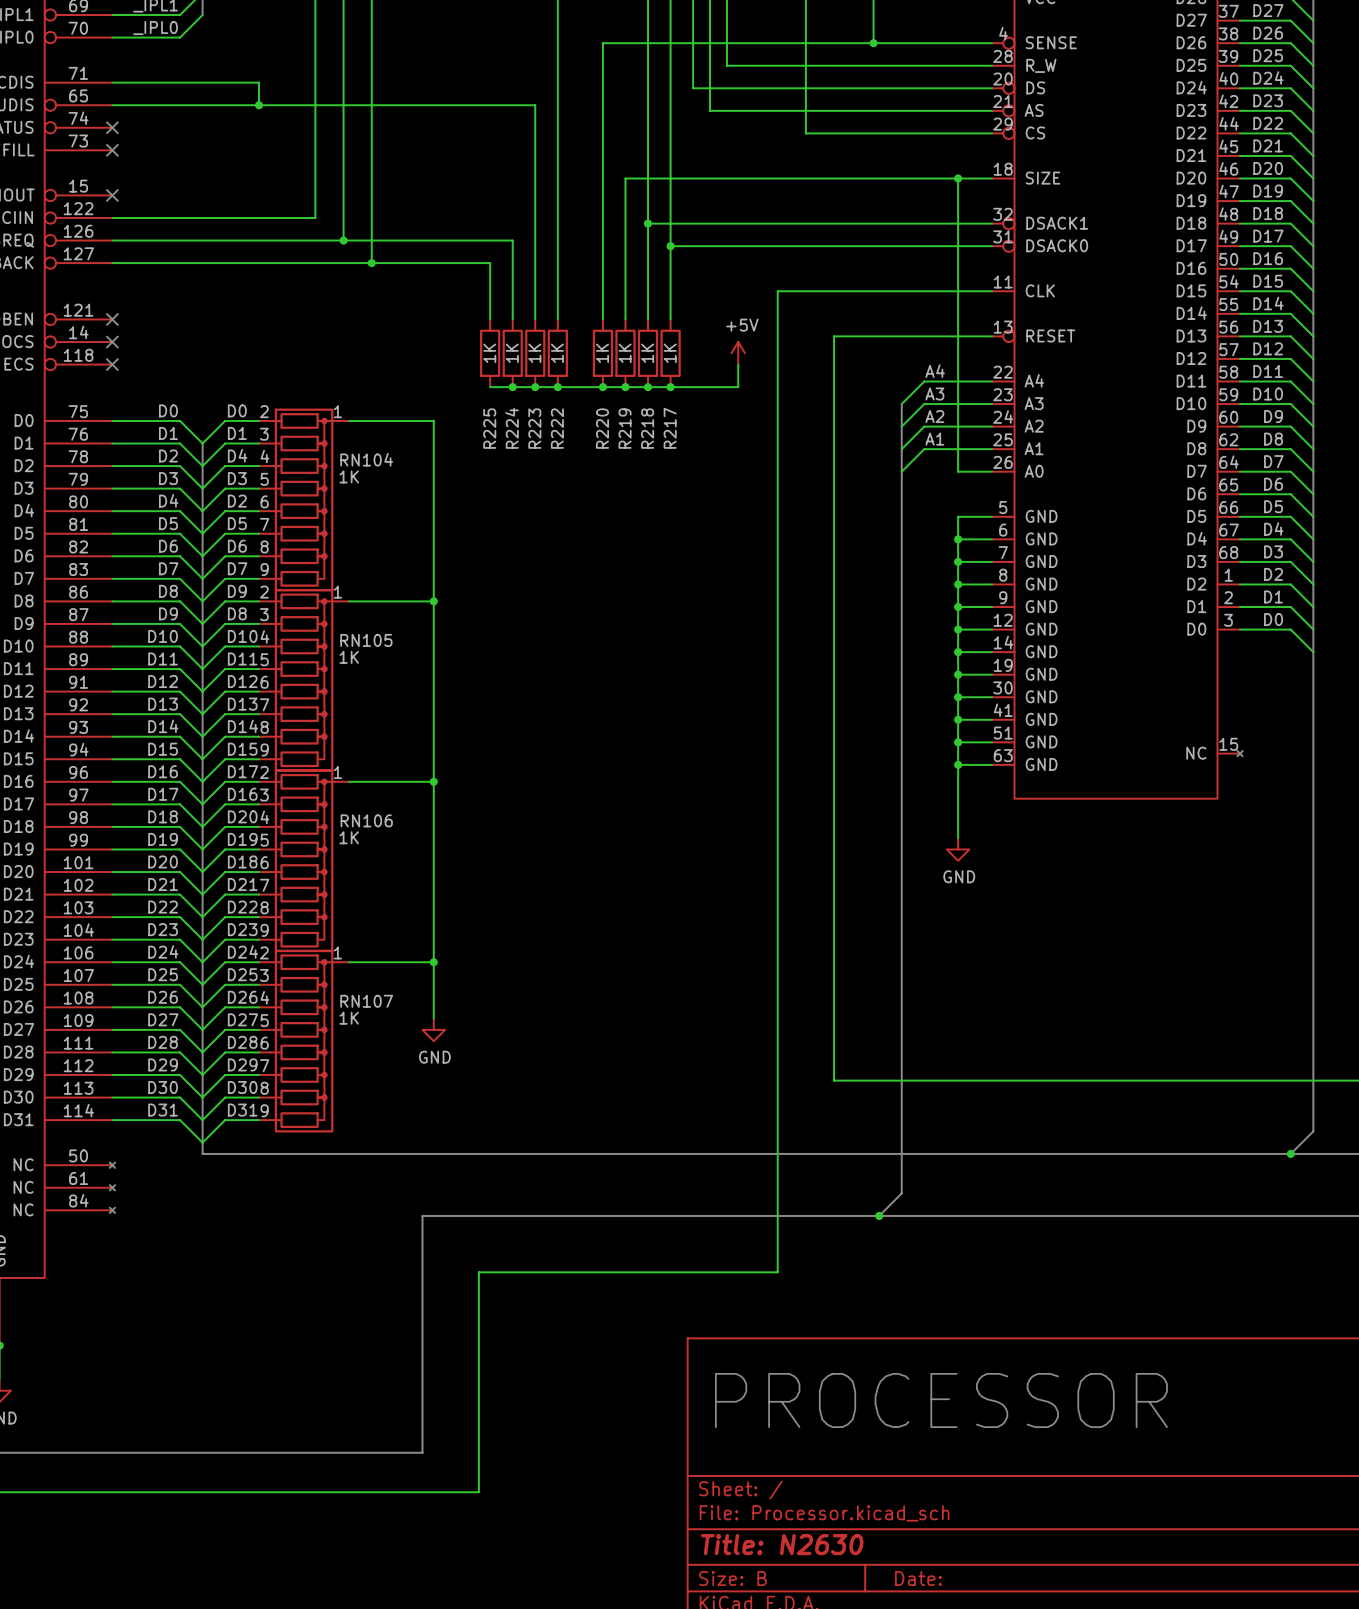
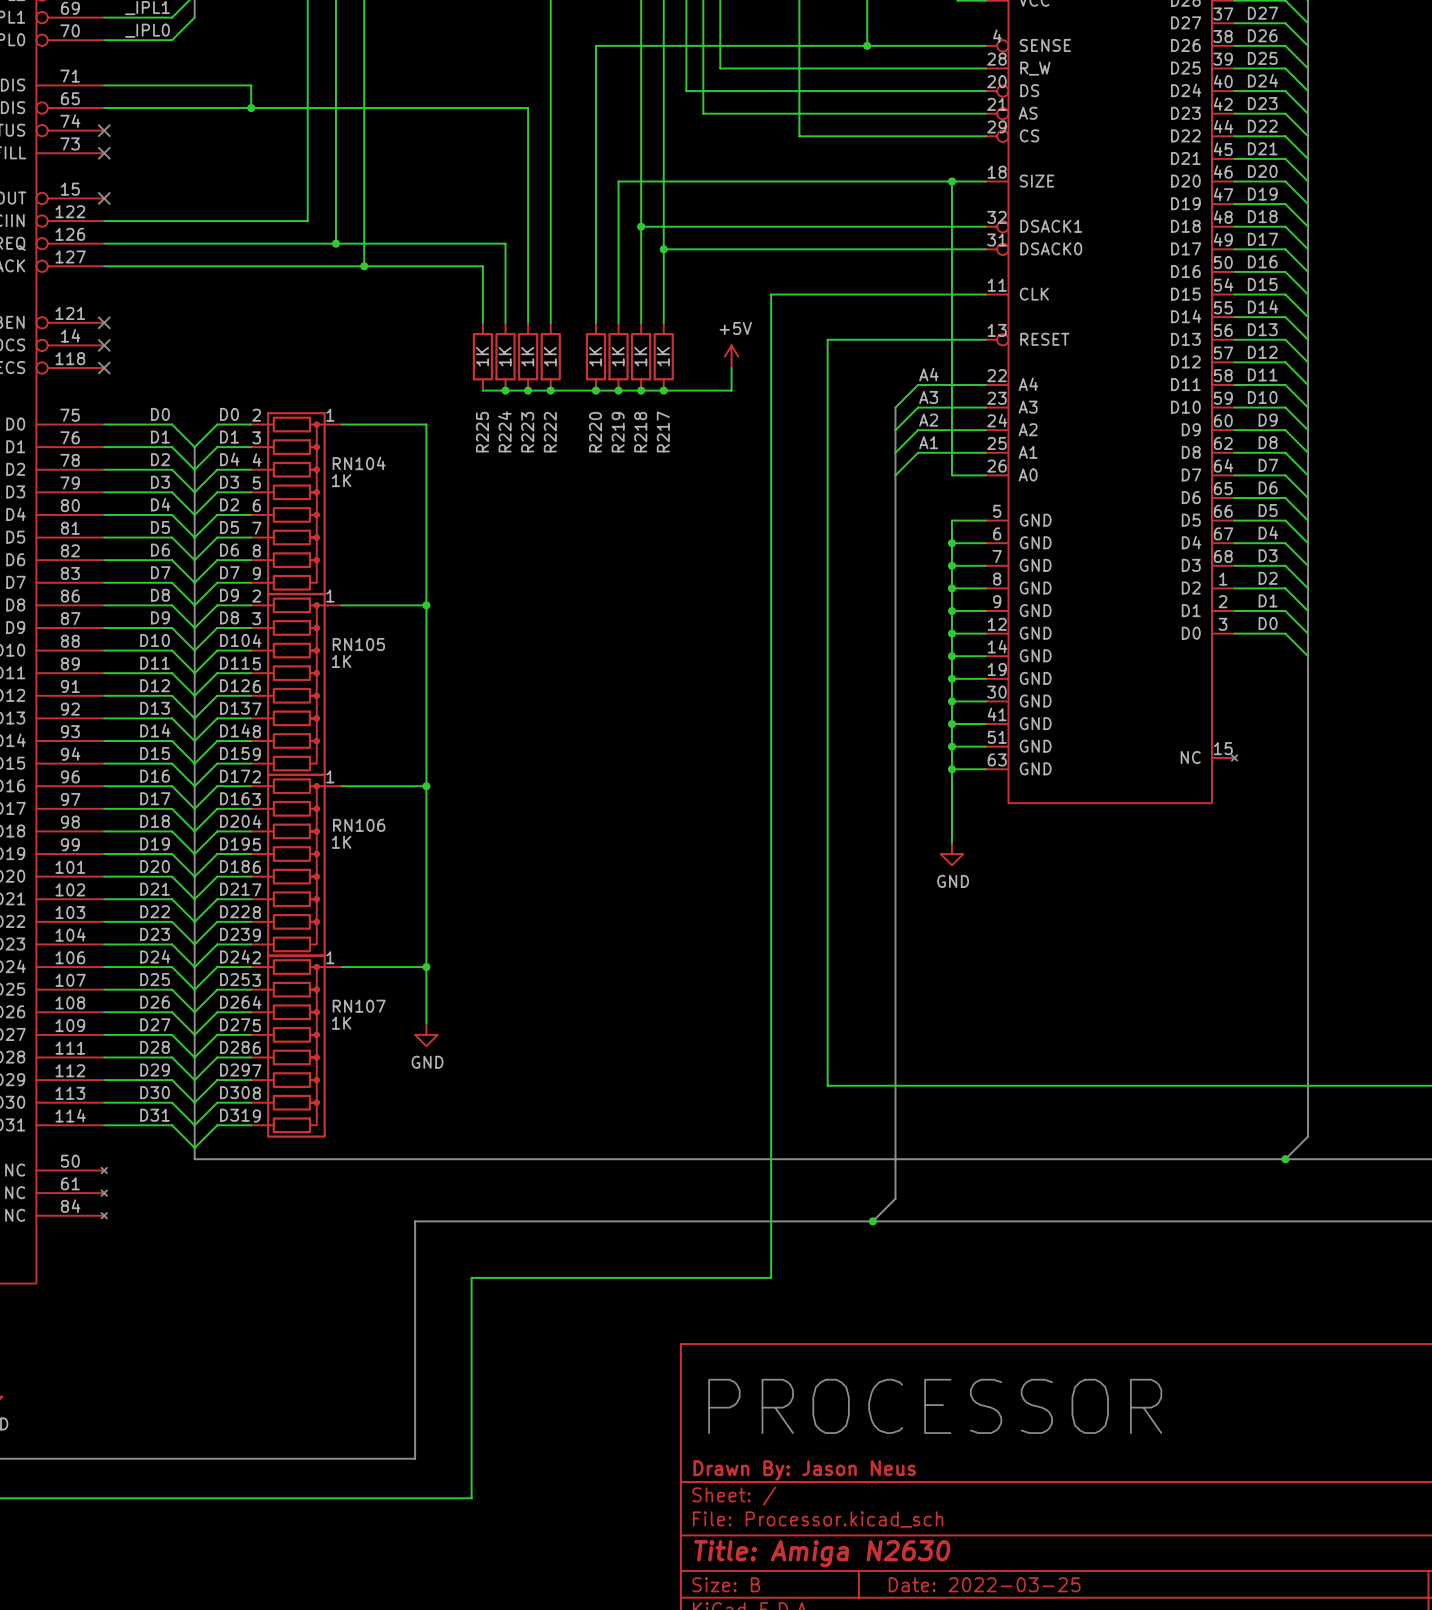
title block: none -> Drawn By: Jason Neus (804, 1470)
title block: Title: N2630 (782, 1544) -> Title: Amiga N2630 (822, 1553)
title block: Date: (918, 1578) -> Date: 2022-03-25 (984, 1584)

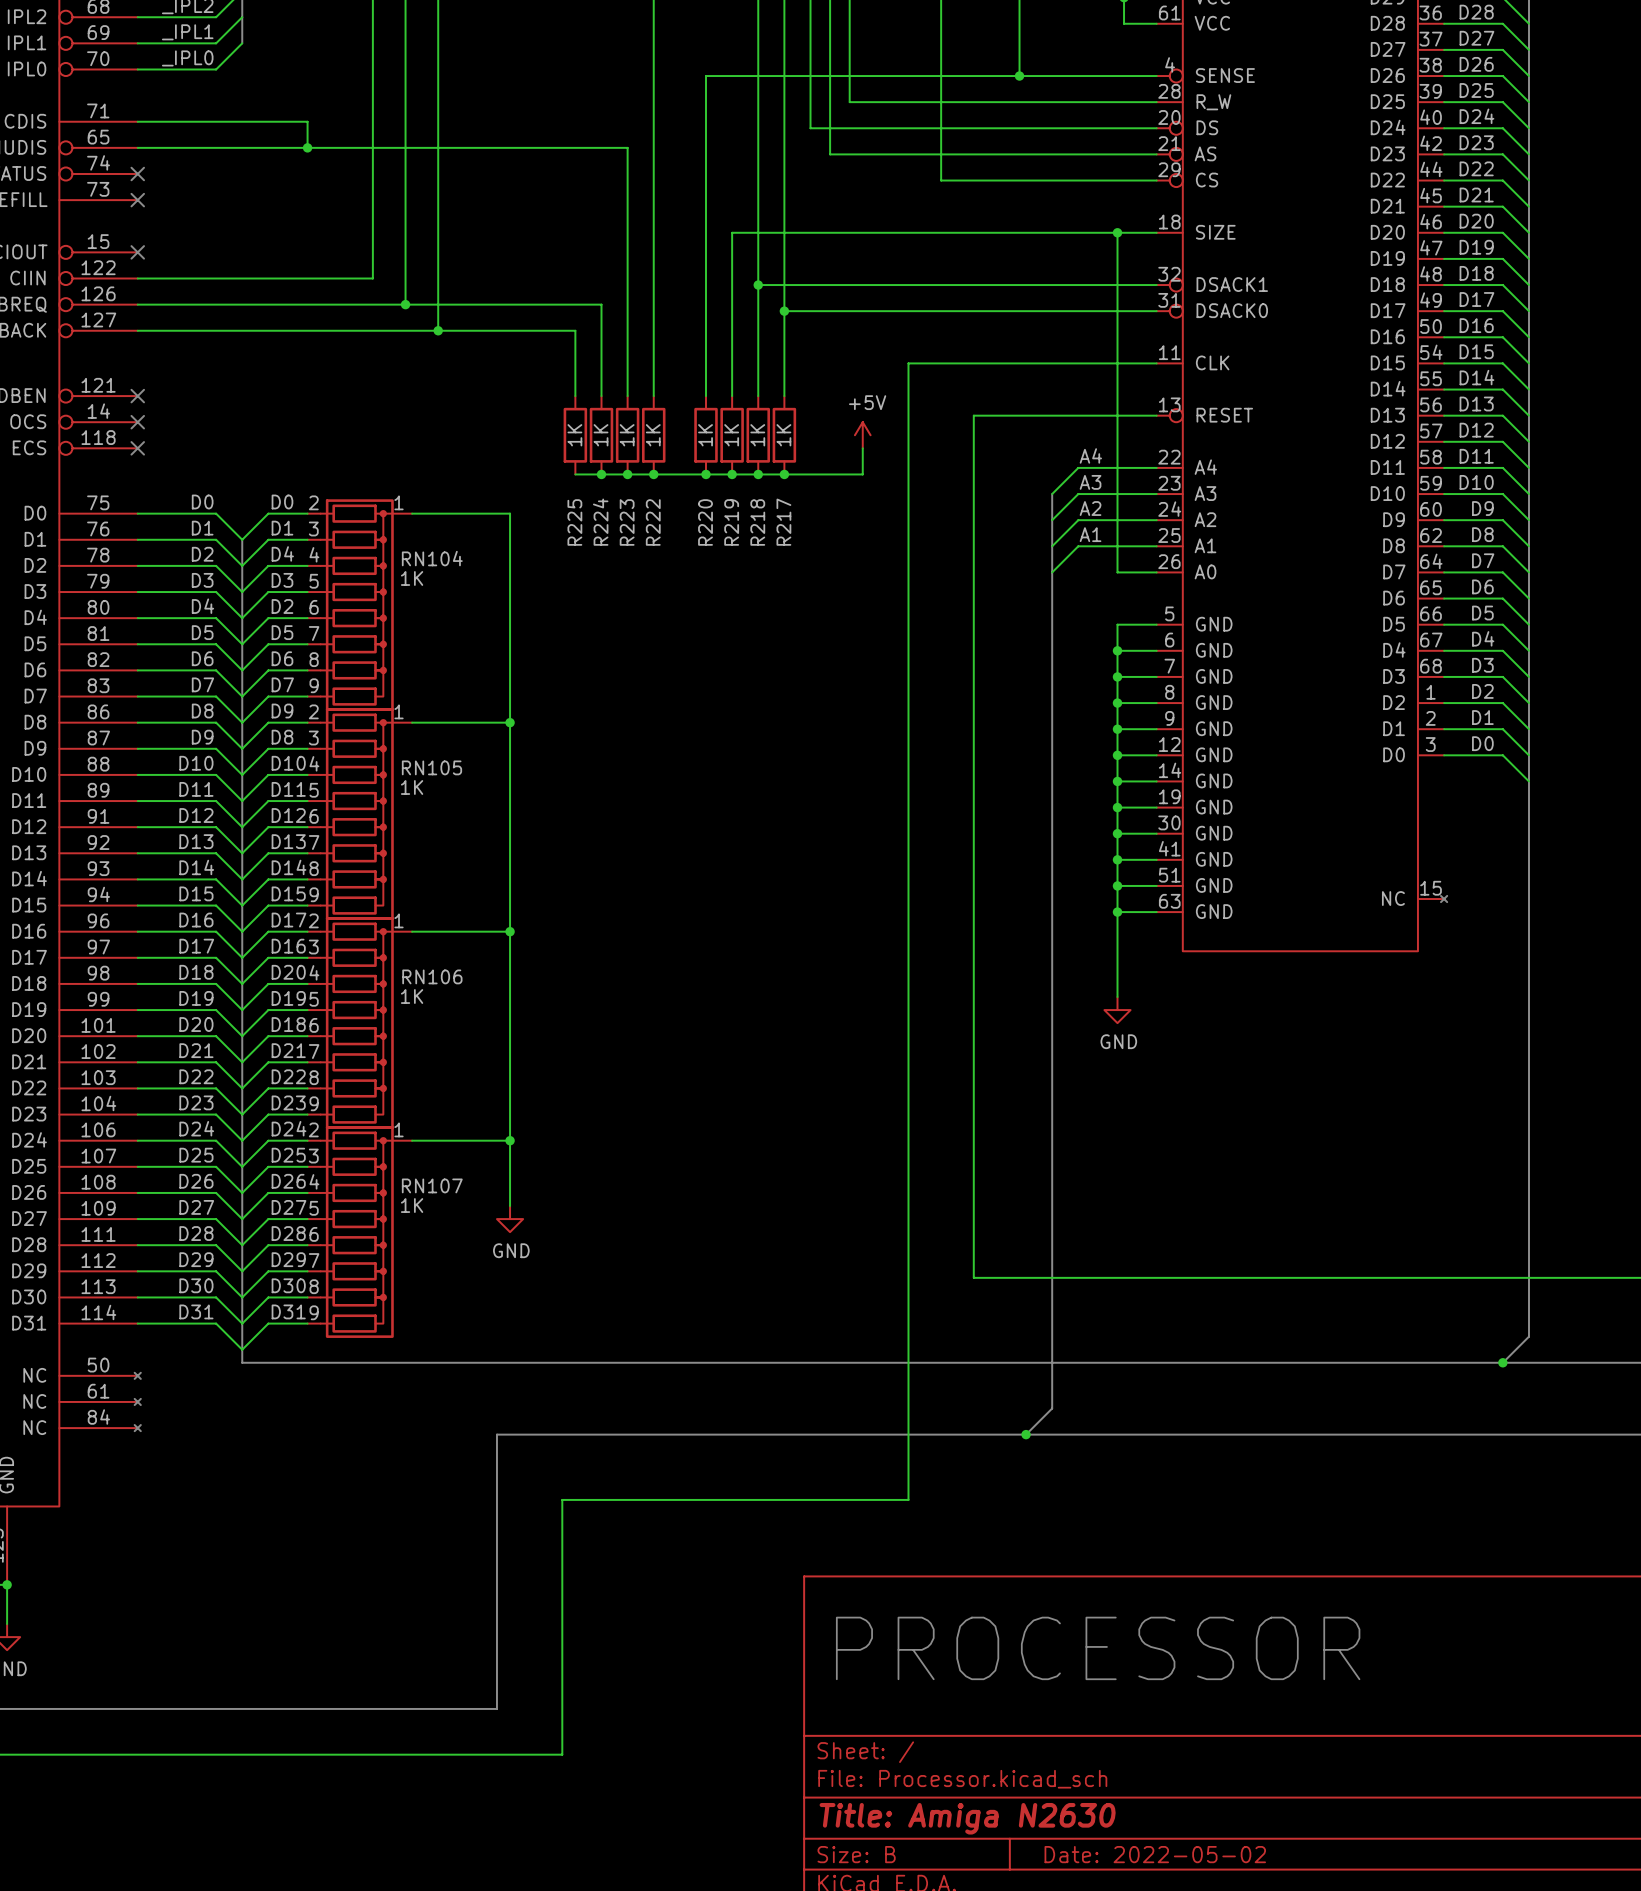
title block: Drawn By: Jason Neus (804, 1470) -> none
title block: Date: 2022-03-25 (984, 1584) -> Date: 2022-05-02 (1155, 1854)

